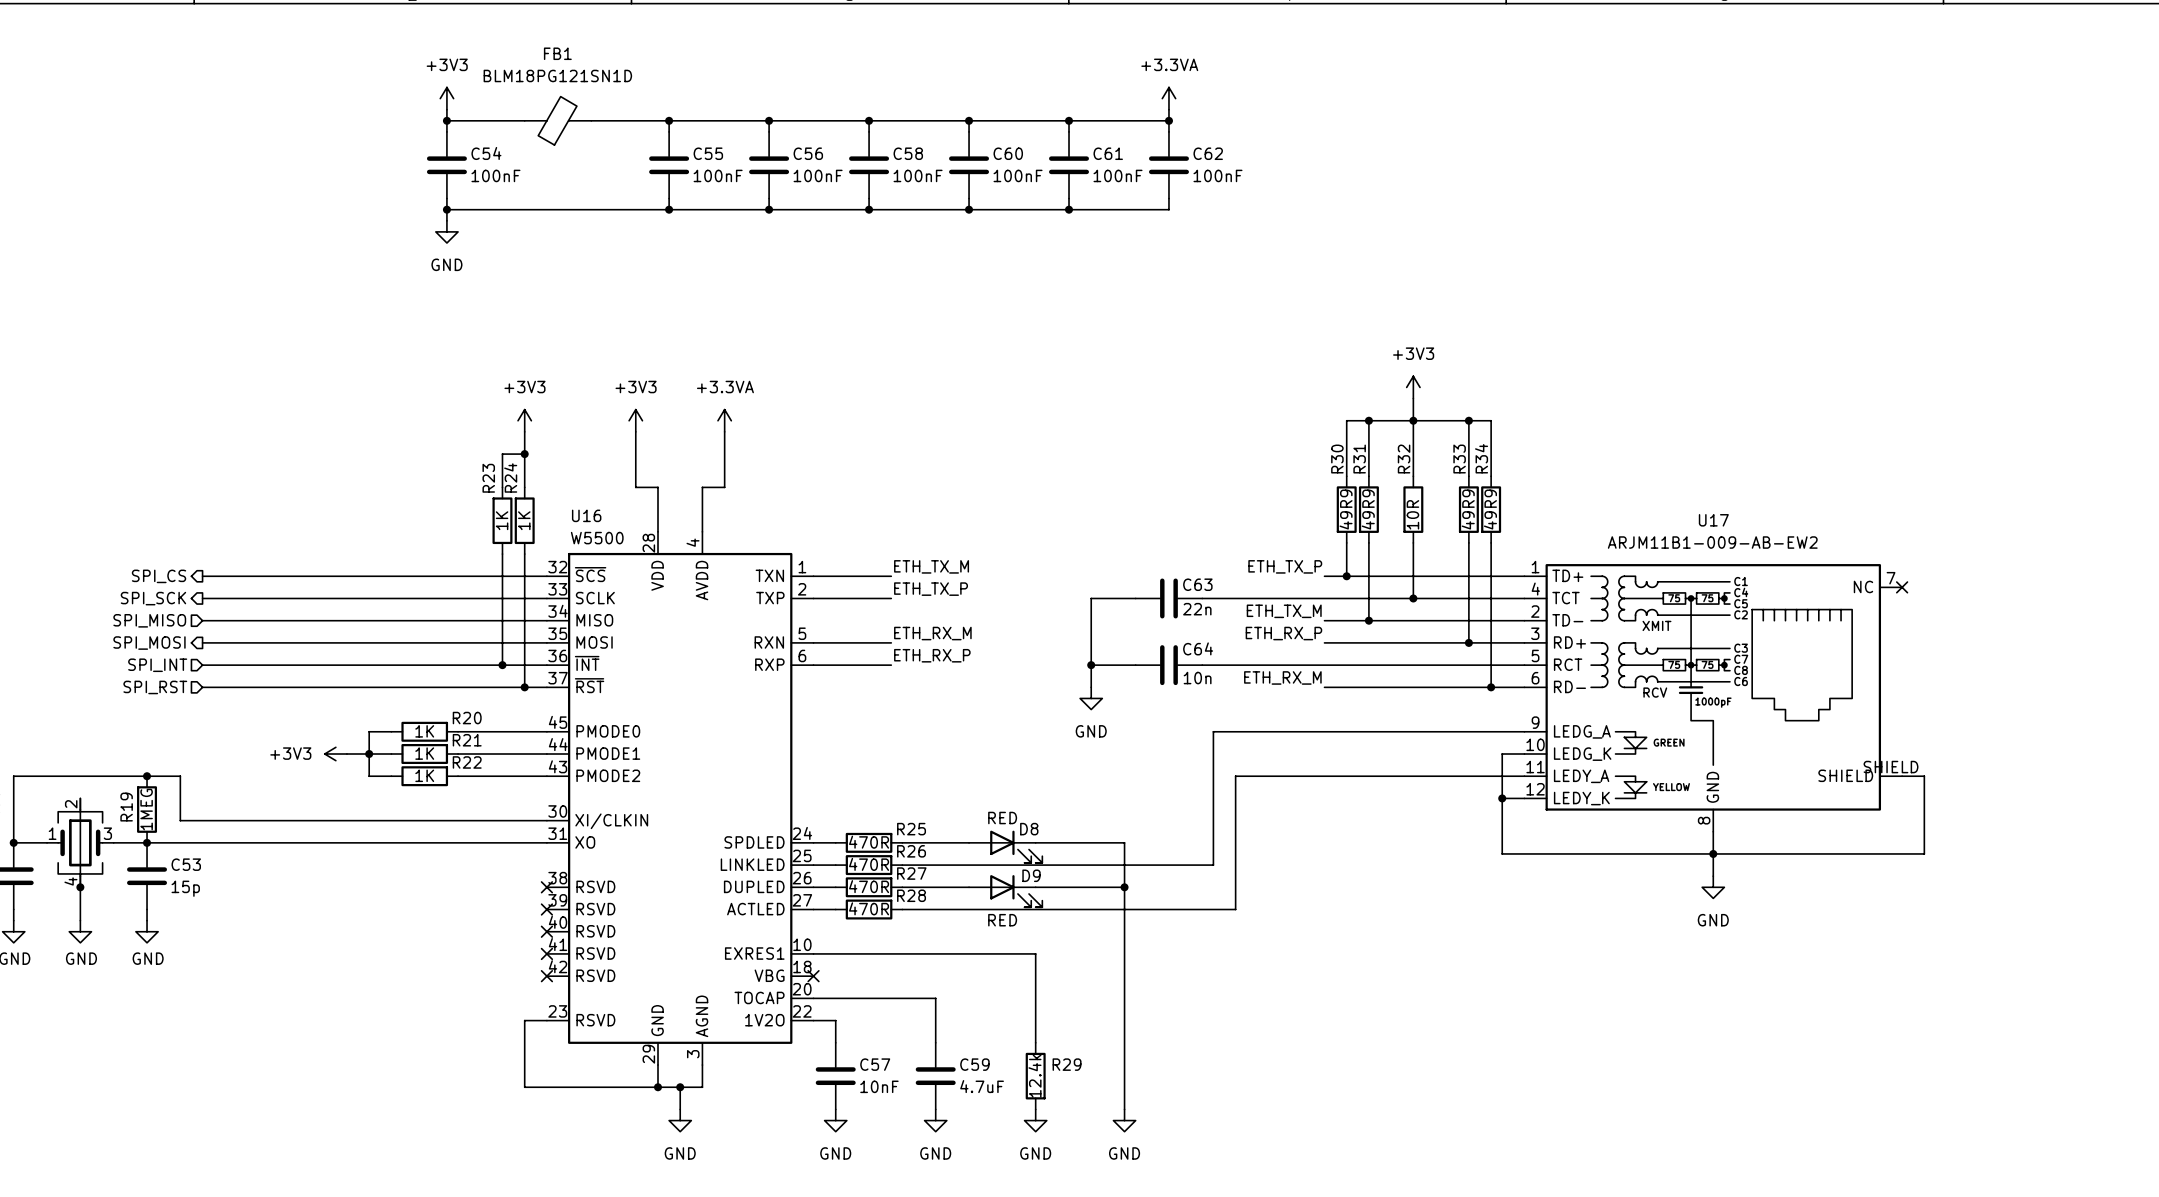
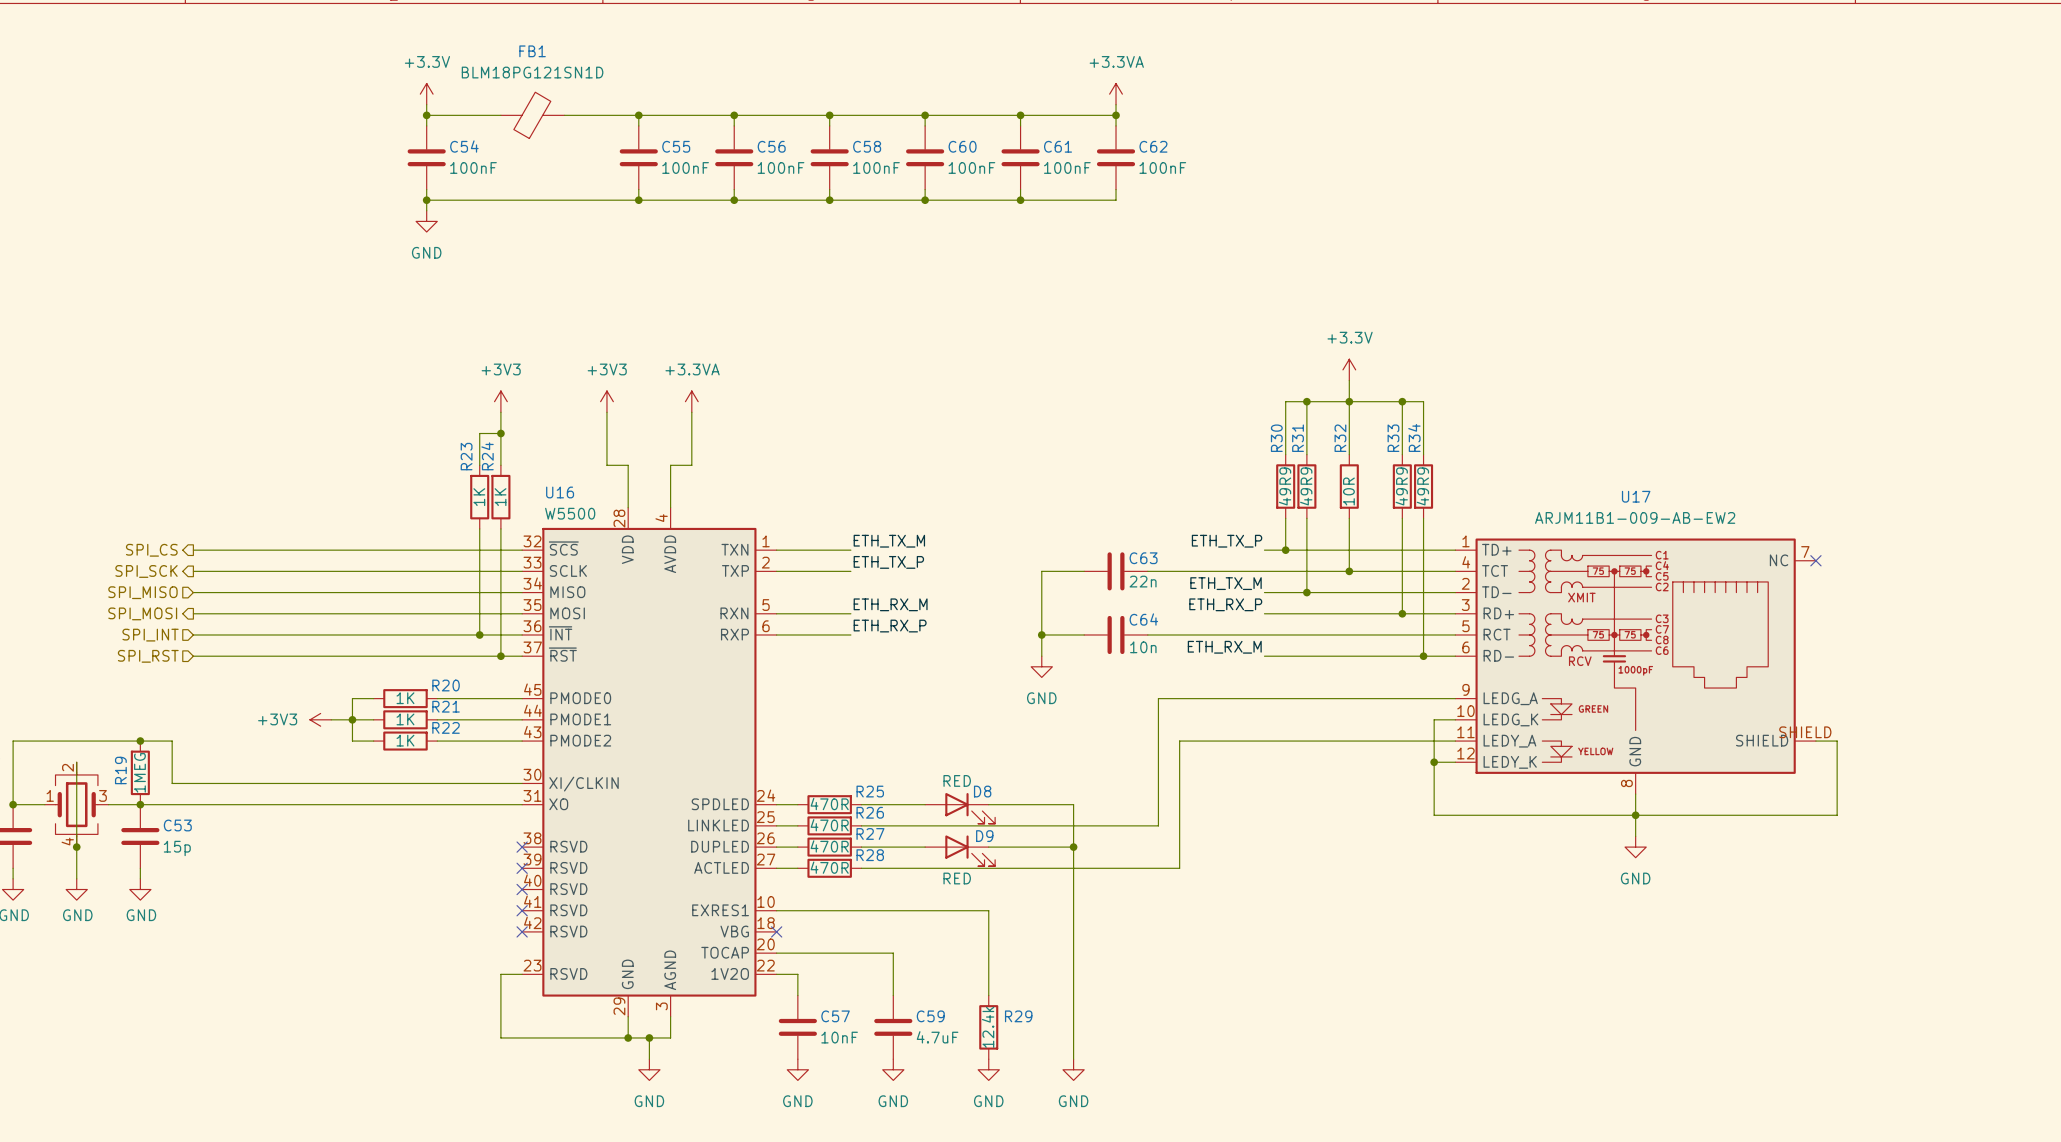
power symbol: +3V3 (446, 98) -> +3.3V (426, 94)
power symbol: +3V3 (1413, 387) -> +3.3V (1349, 369)

